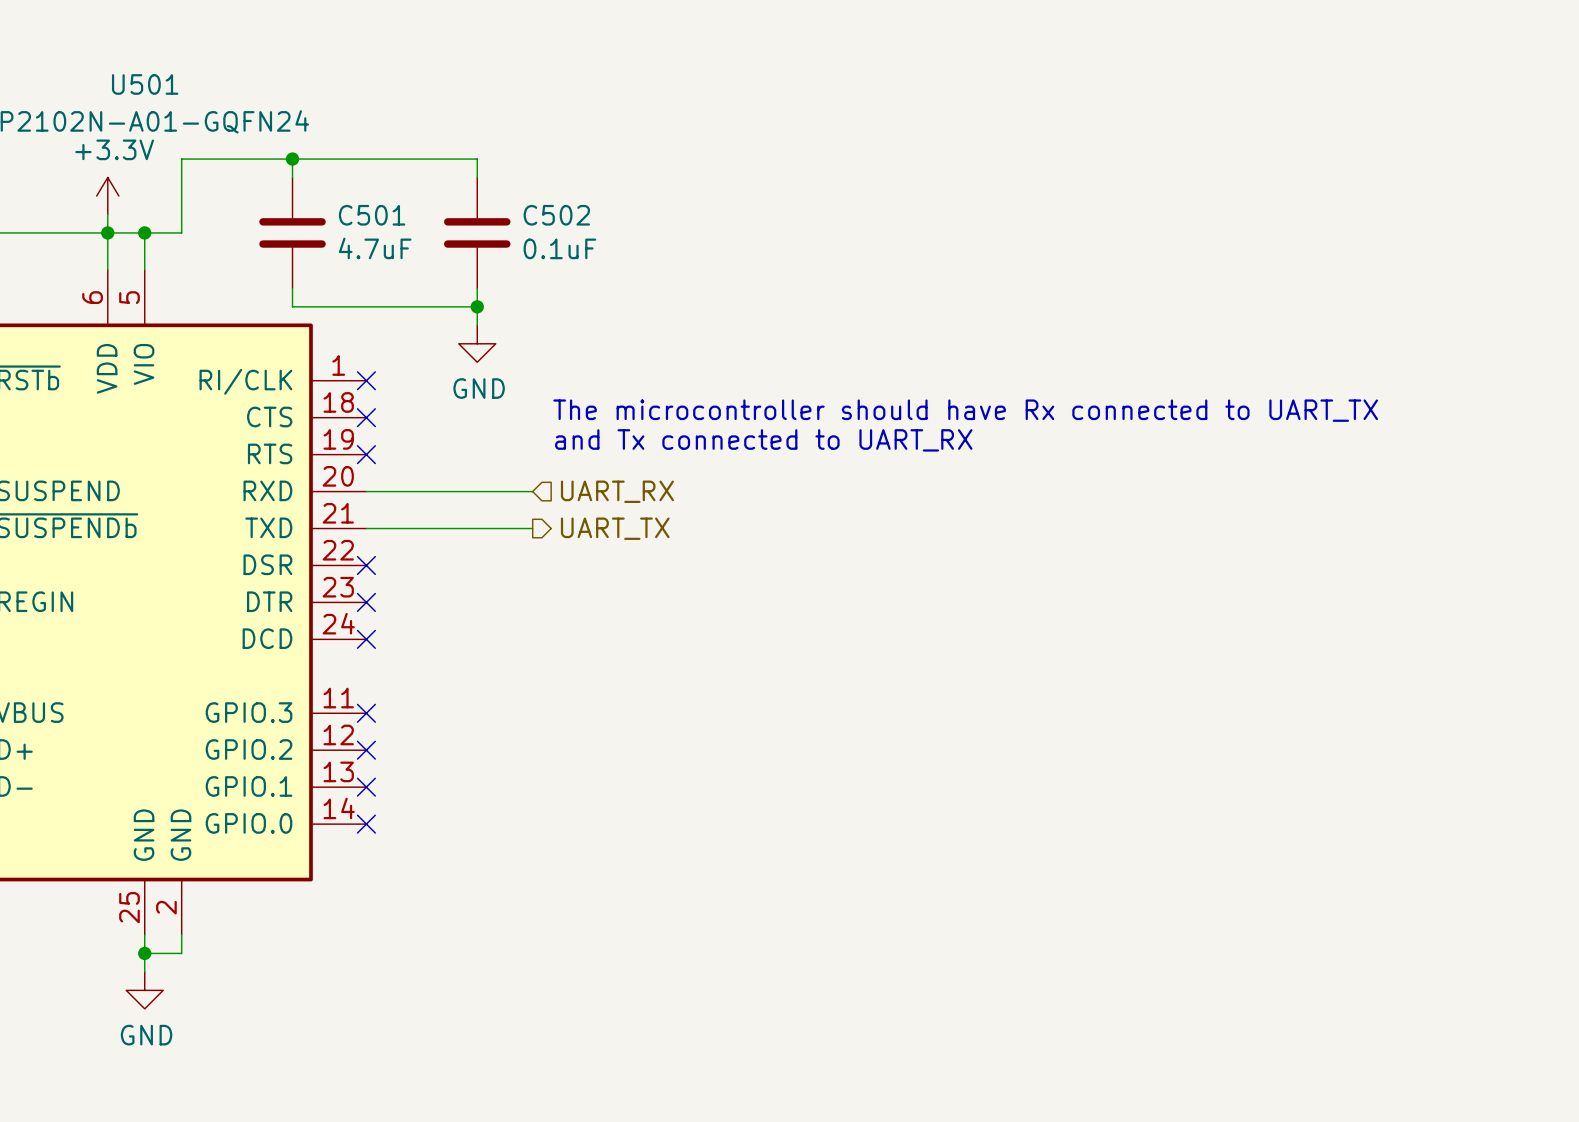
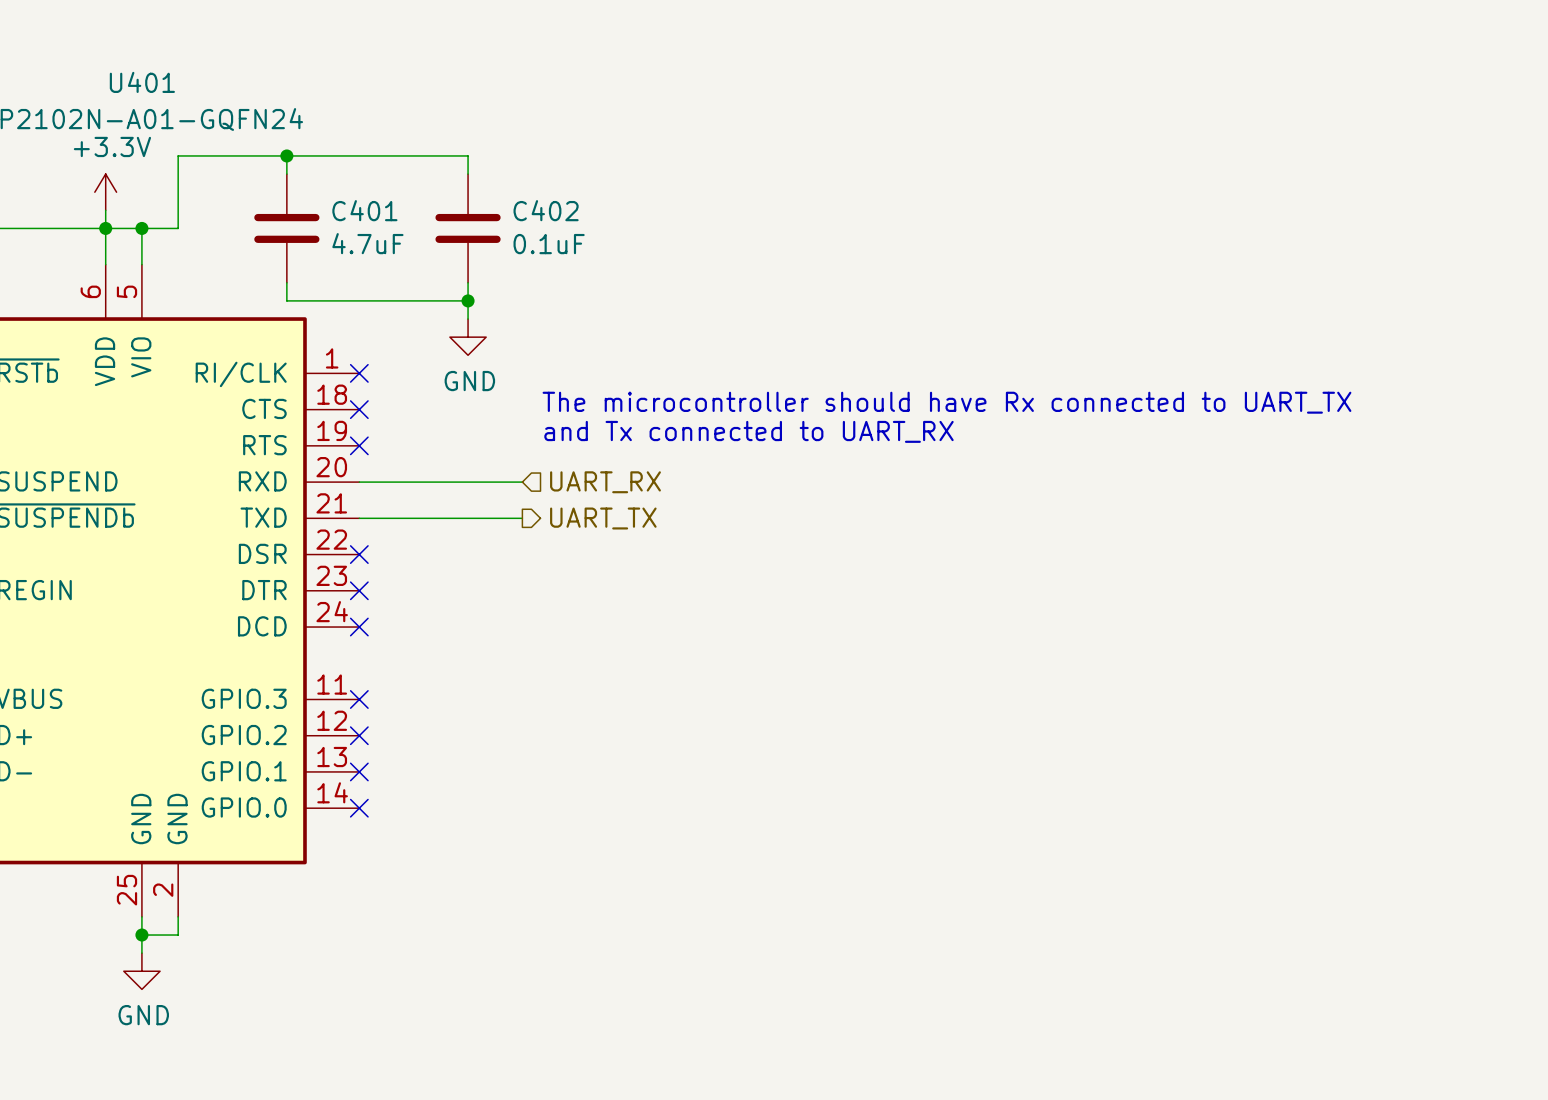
U501 name: U501 (145, 84) -> U401 (142, 82)
C501 name: C501 (372, 215) -> C401 (364, 210)
C502 name: C502 (556, 215) -> C402 (546, 210)

